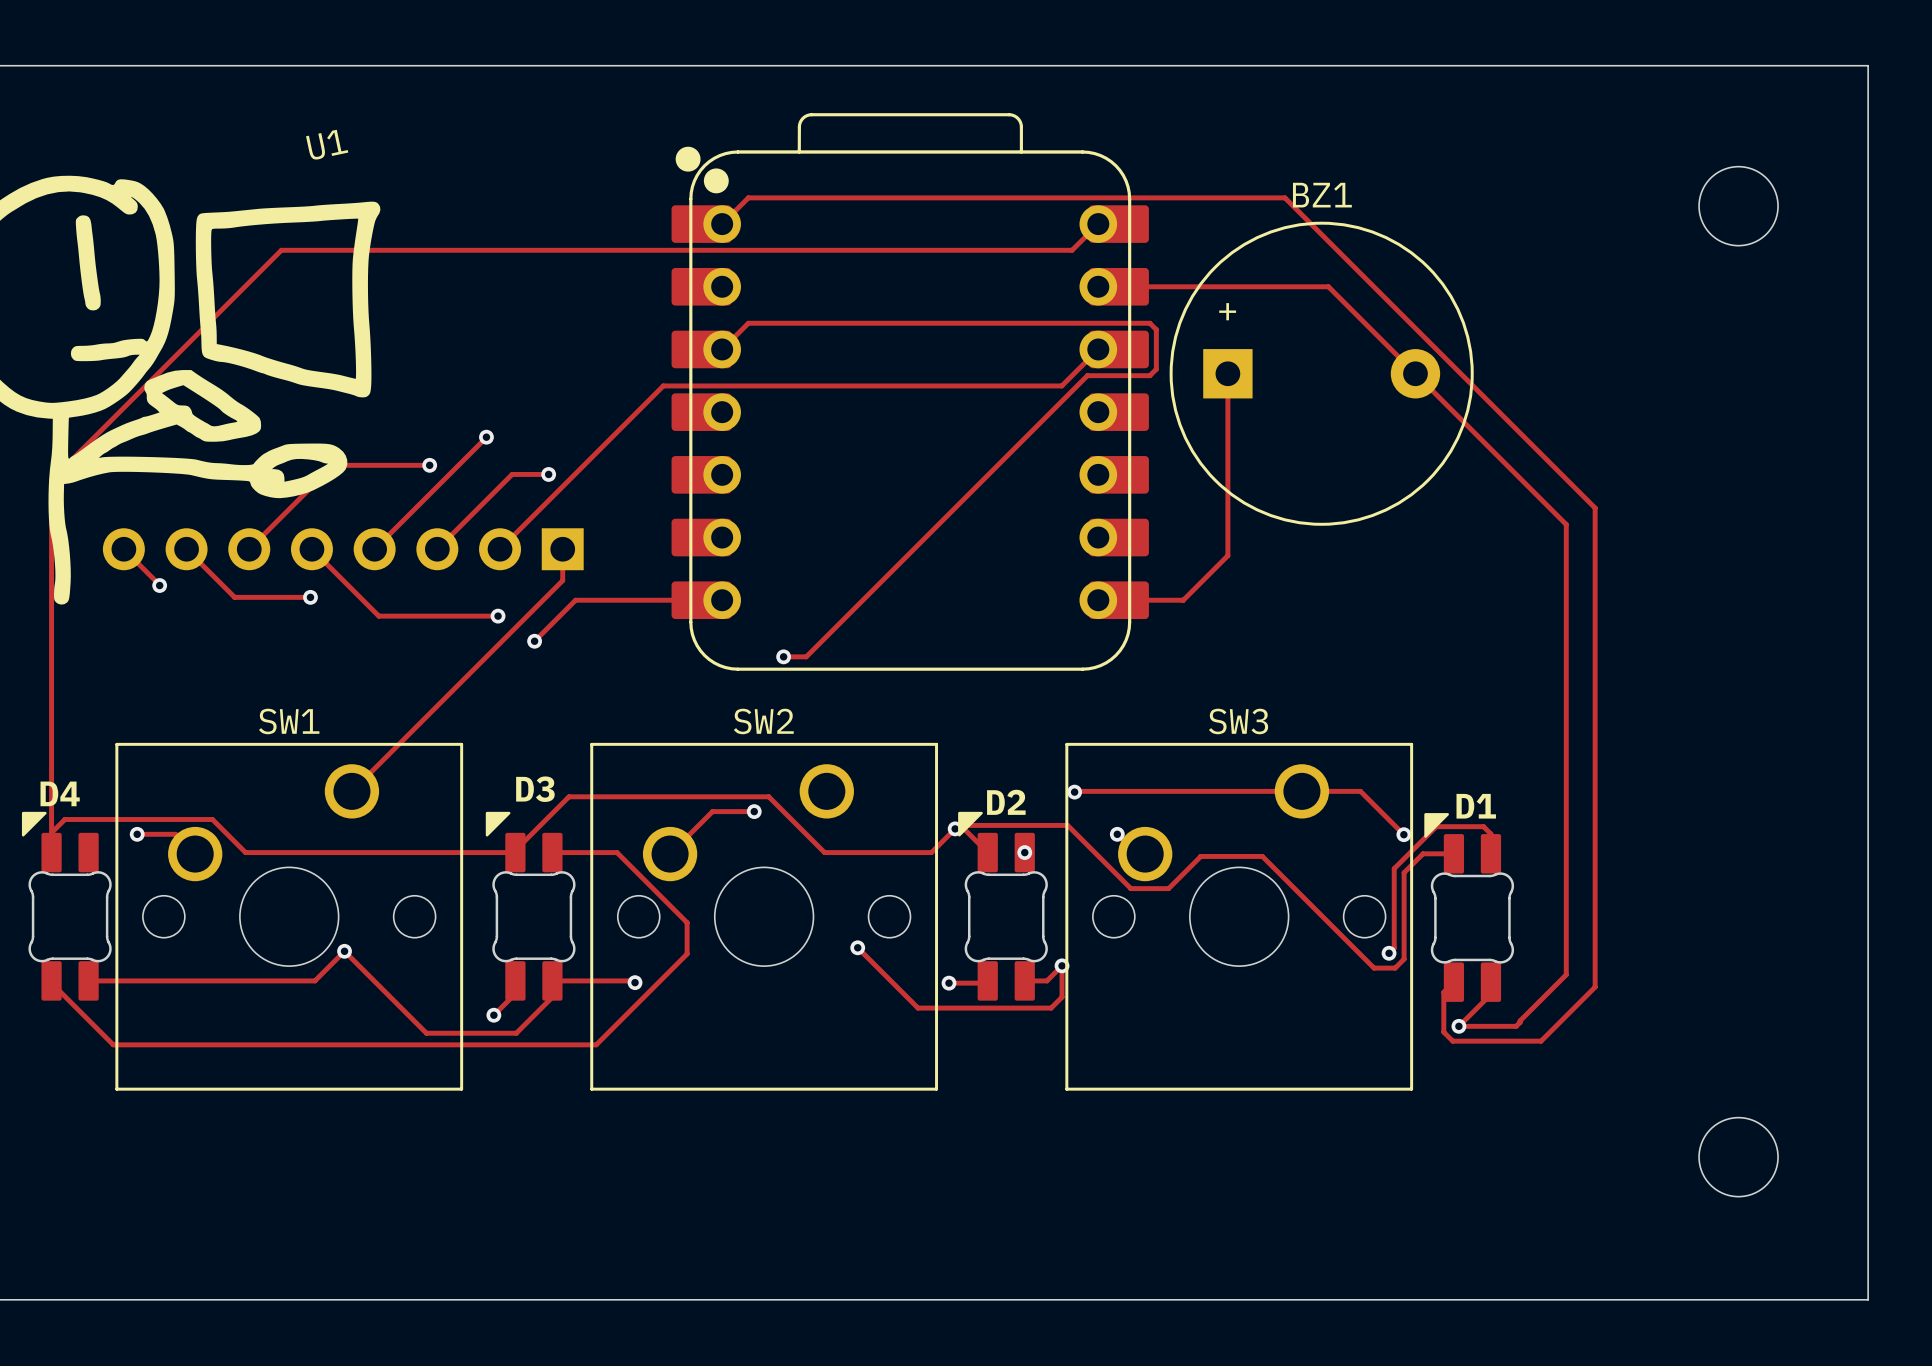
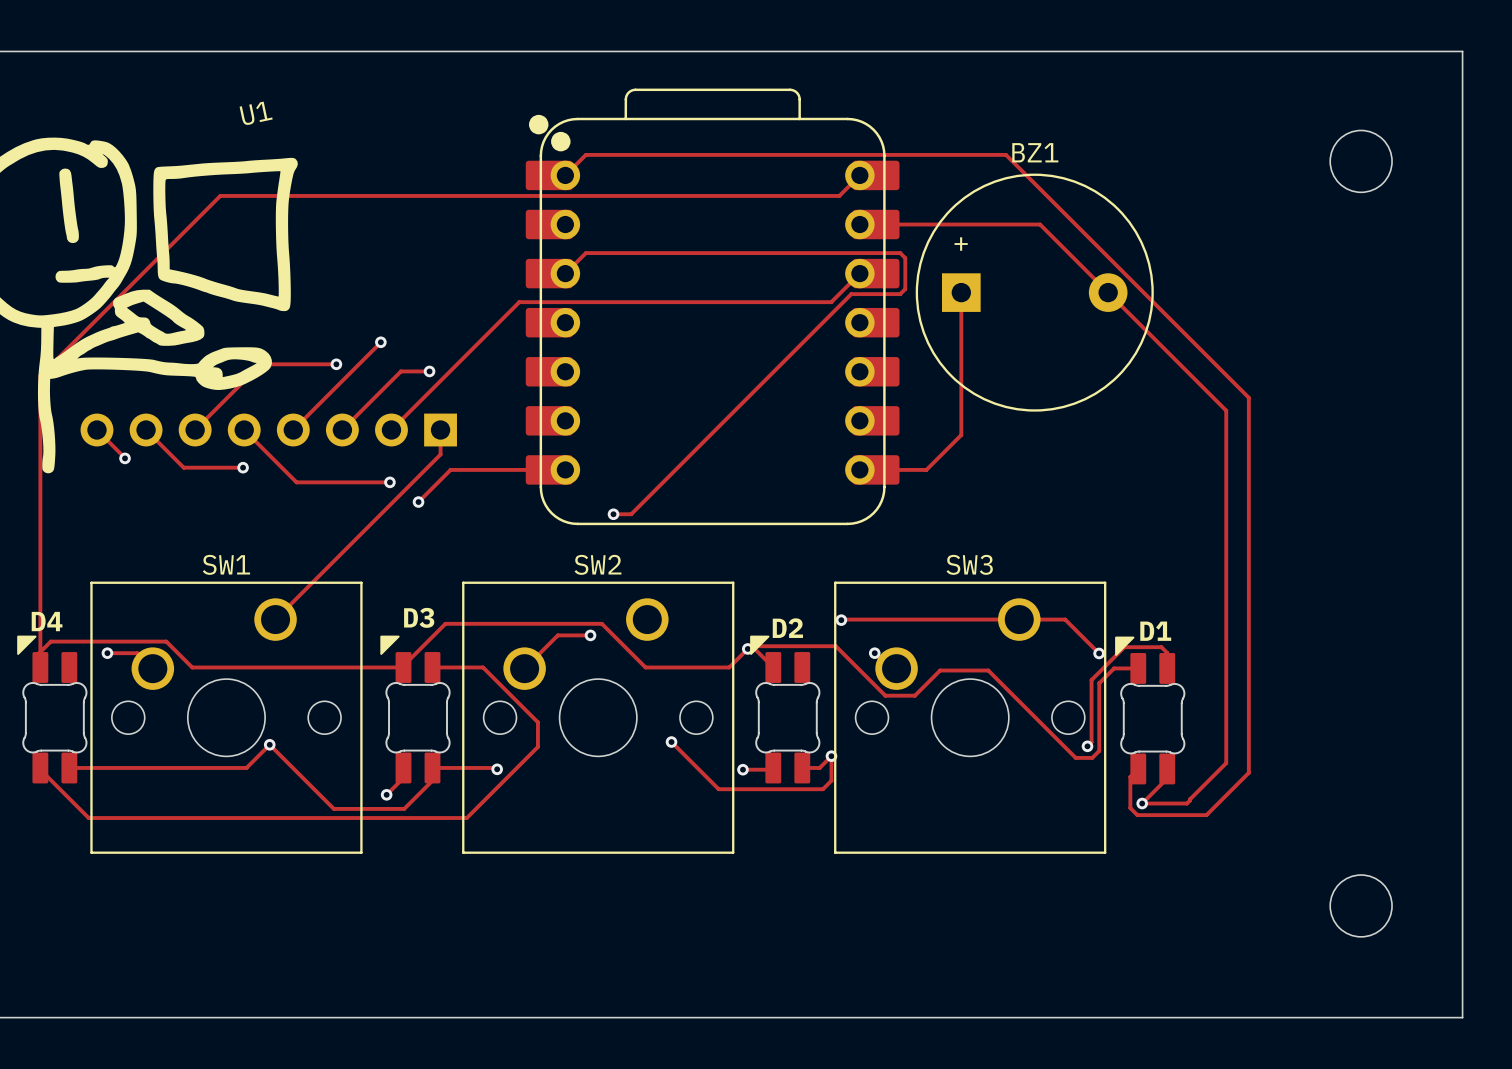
via: (1024, 852) -> none

